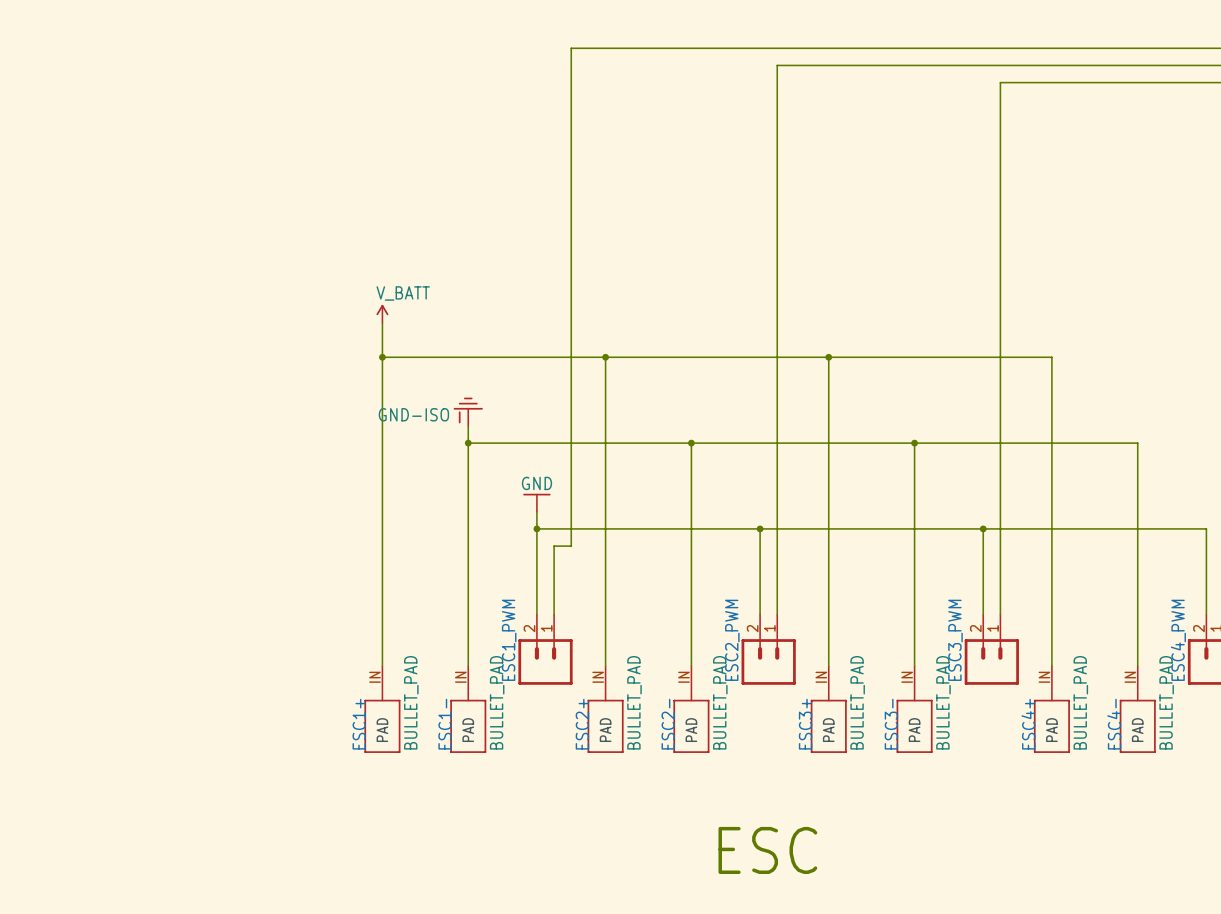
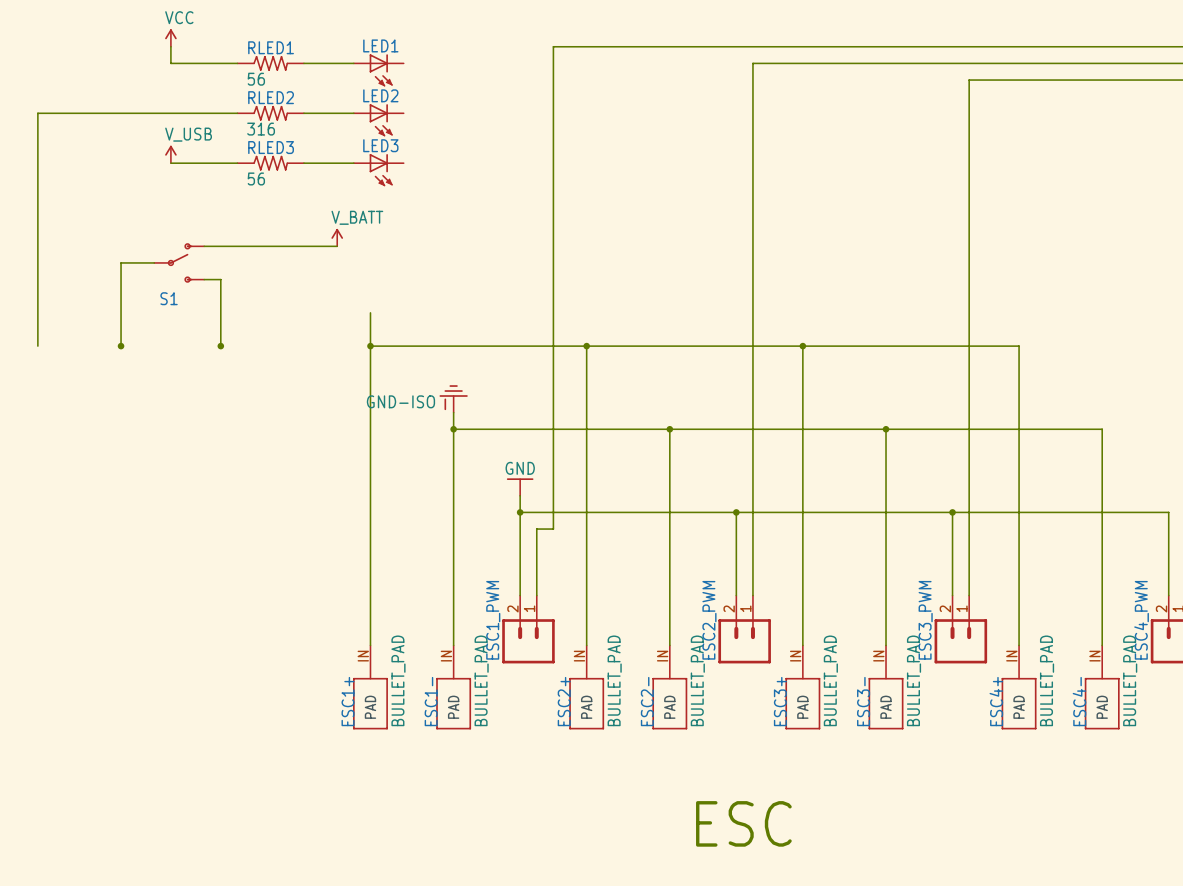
power symbol: none -> VCC (170, 38)
wire: none -> (170, 46) (170, 63) (237, 63)
RLED1: none -> 56 (270, 63)
wire: none -> (303, 63) (353, 63)
LED1: none -> (378, 70)
wire: none -> (237, 113) (37, 113) (37, 346)
RLED2: none -> 316 (270, 113)
wire: none -> (303, 113) (353, 113)
LED2: none -> (378, 120)
power symbol: none -> V_USB (170, 154)
wire: none -> (170, 163) (237, 163)
RLED3: none -> 56 (270, 163)
wire: none -> (303, 163) (353, 163)
LED3: none -> (378, 170)
wire: none -> (204, 246) (337, 246)
wire: none -> (154, 262) (121, 262) (121, 346)
S1: none -> (179, 262)
wire: none -> (204, 279) (220, 279) (220, 346)
power symbol position: V_BATT (382, 313) -> V_BATT (337, 237)
junction: none -> (121, 346)
junction: none -> (220, 346)

